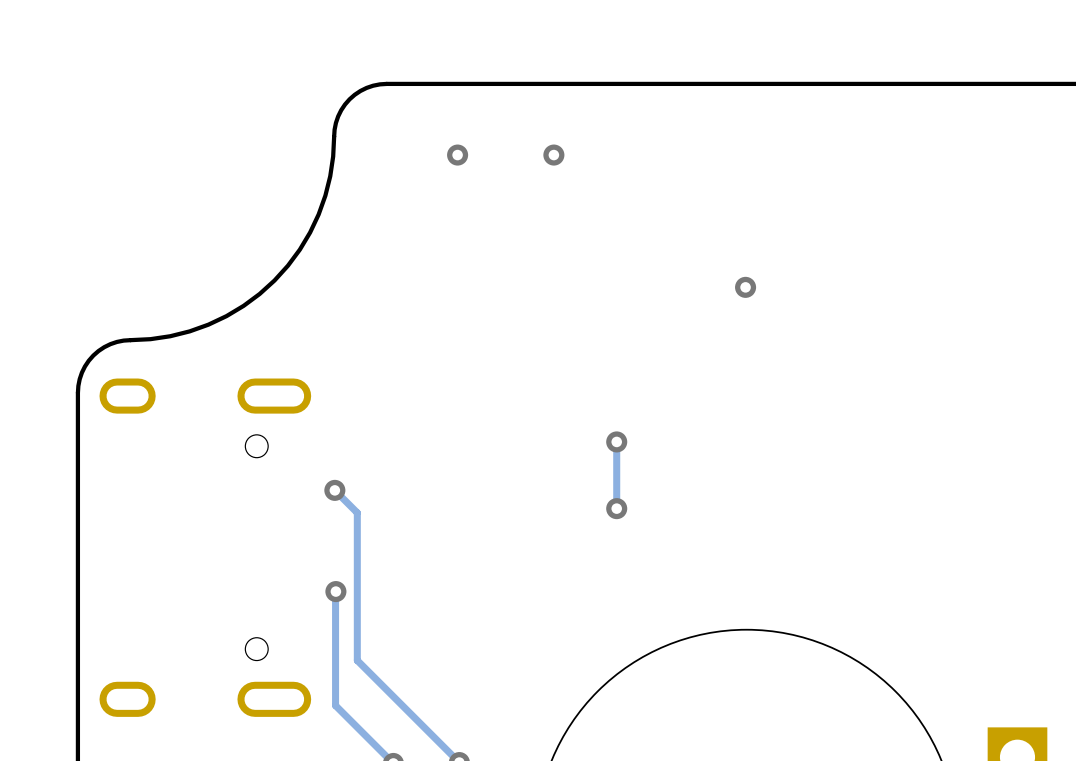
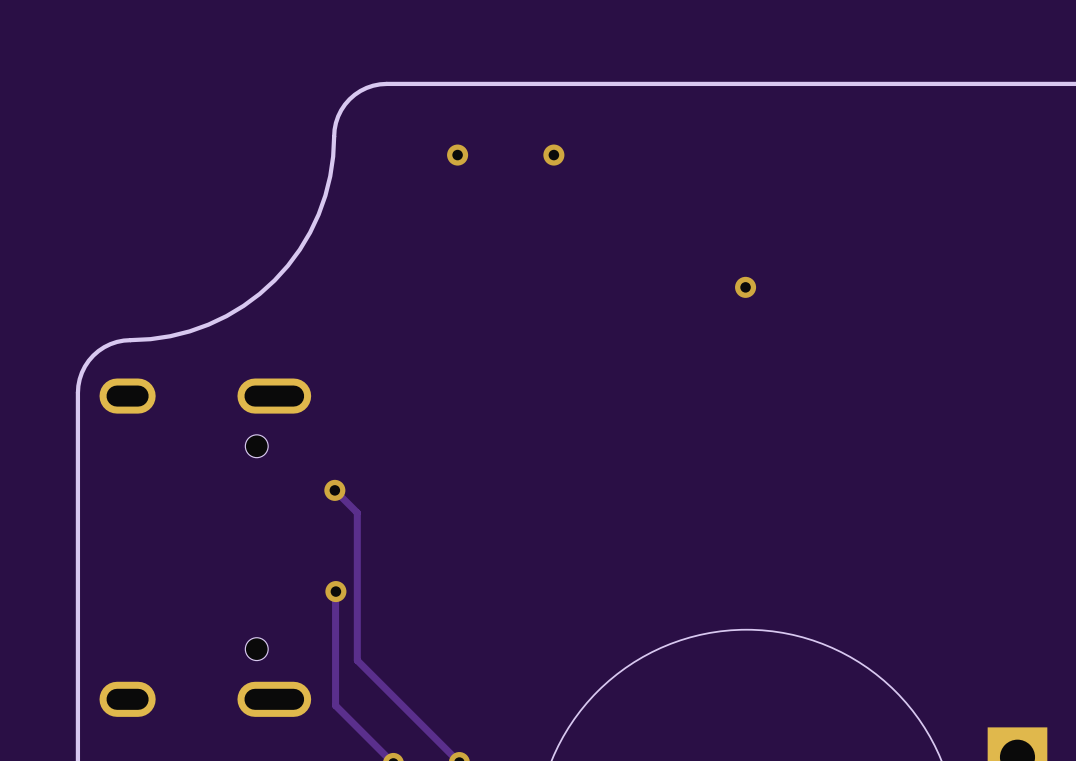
track: (616, 441) (616, 508) -> none
via: (616, 441) -> none
via: (616, 508) -> none

